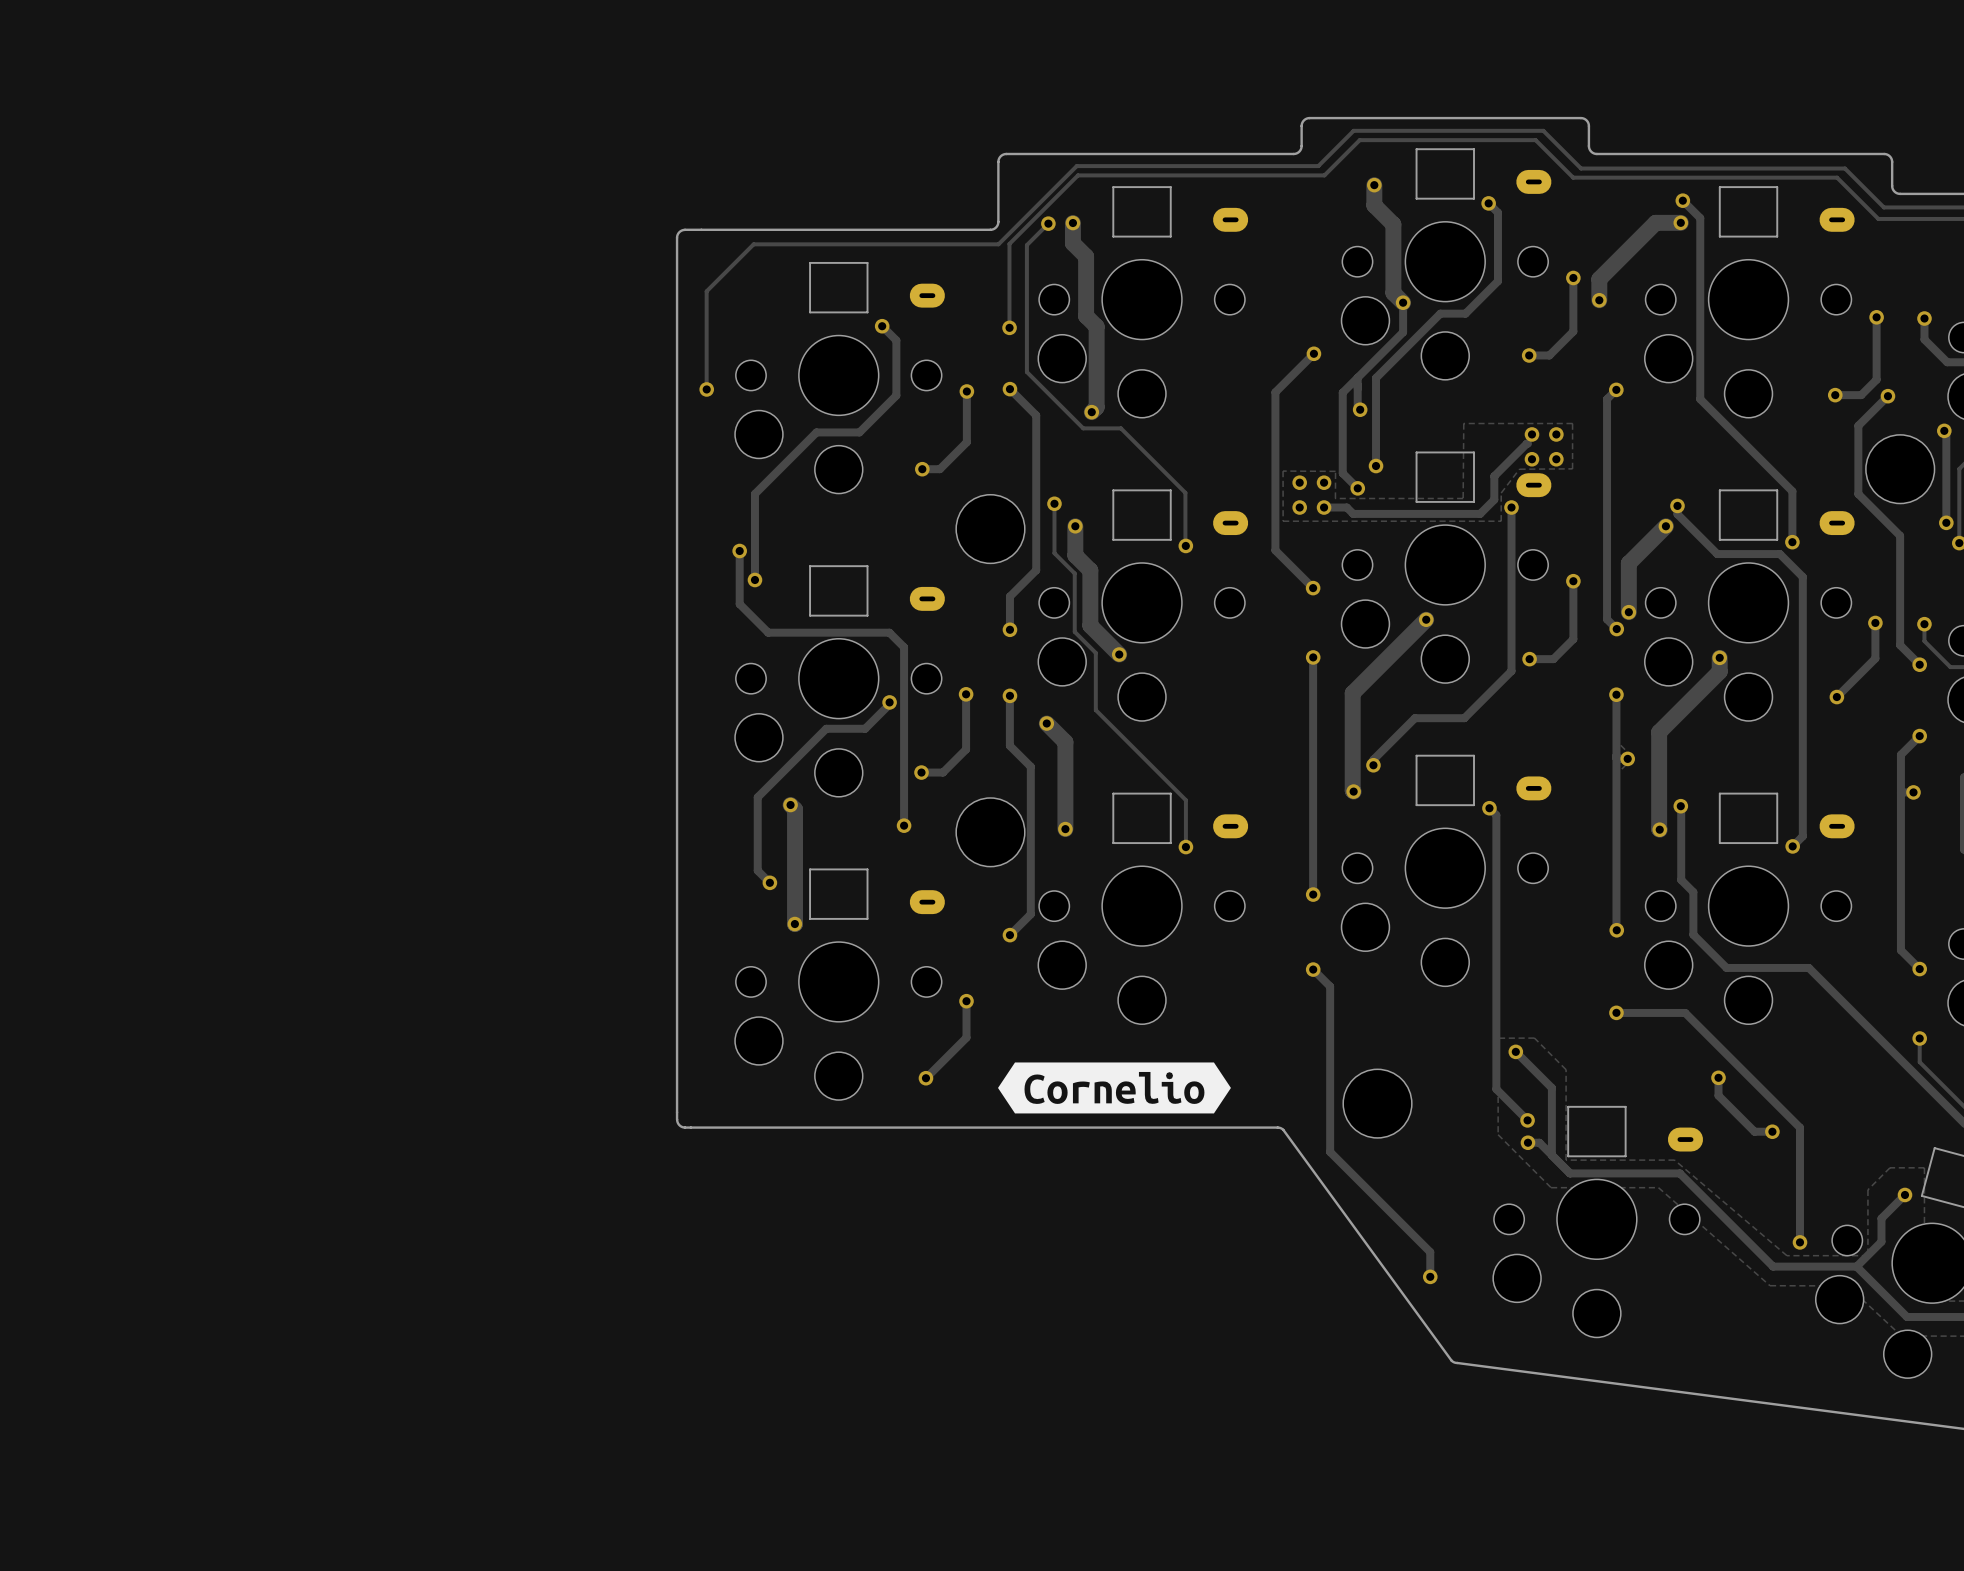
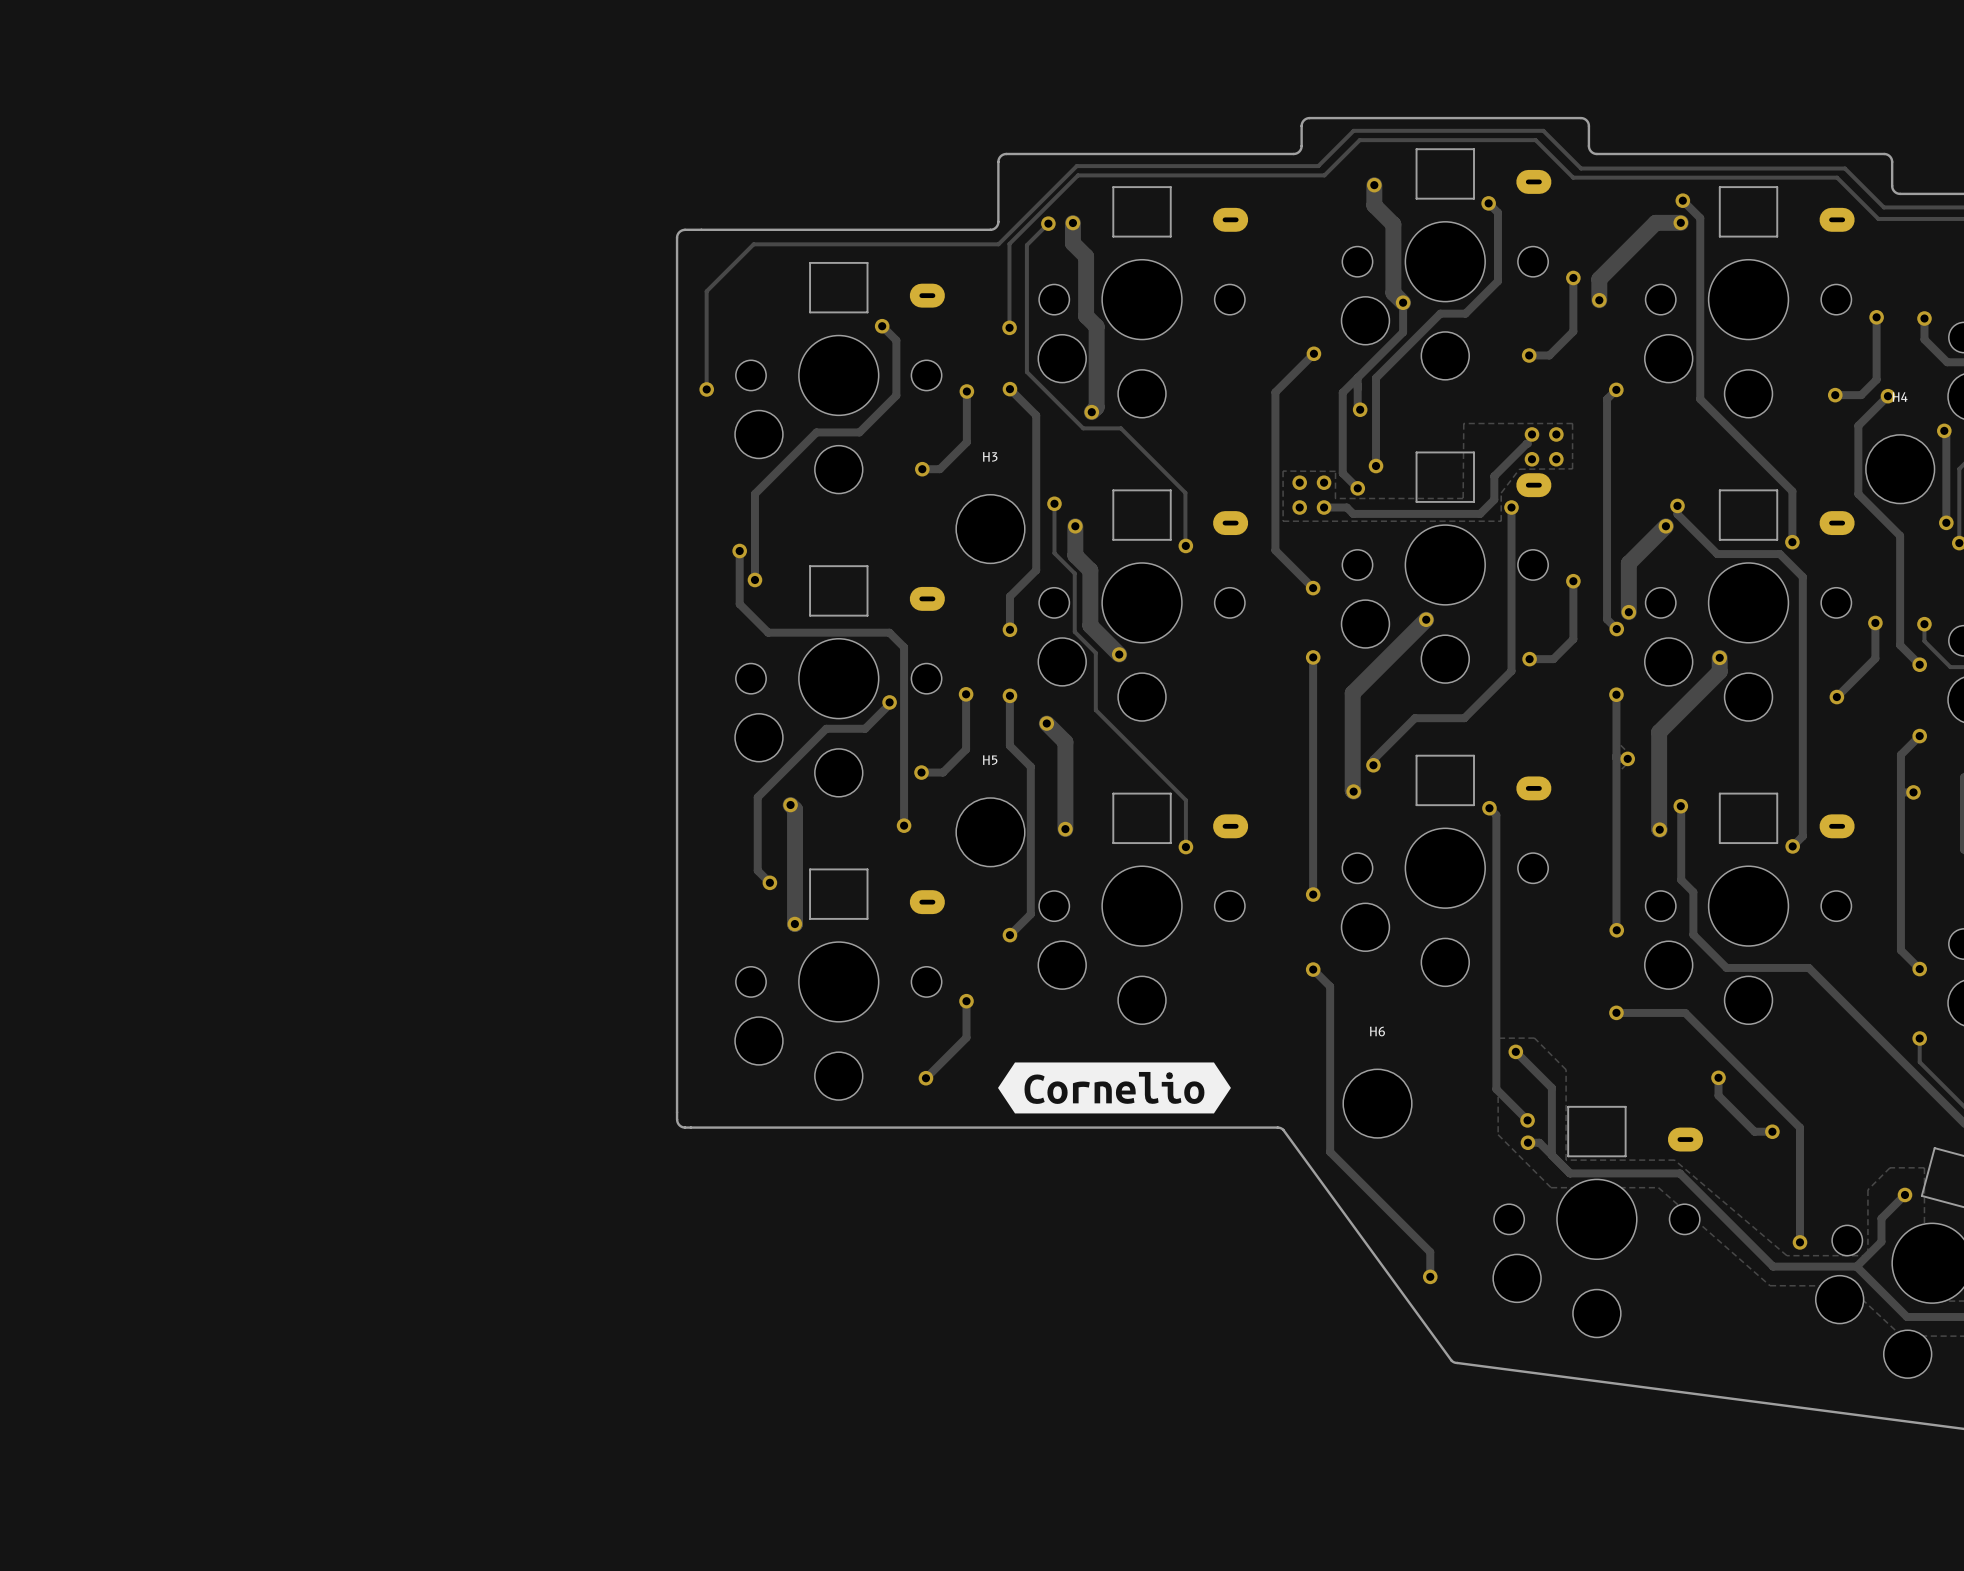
H4 name: none -> H4 (1900, 397)
H3 name: none -> H3 (990, 456)
H5 name: none -> H5 (990, 760)
H6 name: none -> H6 (1377, 1031)

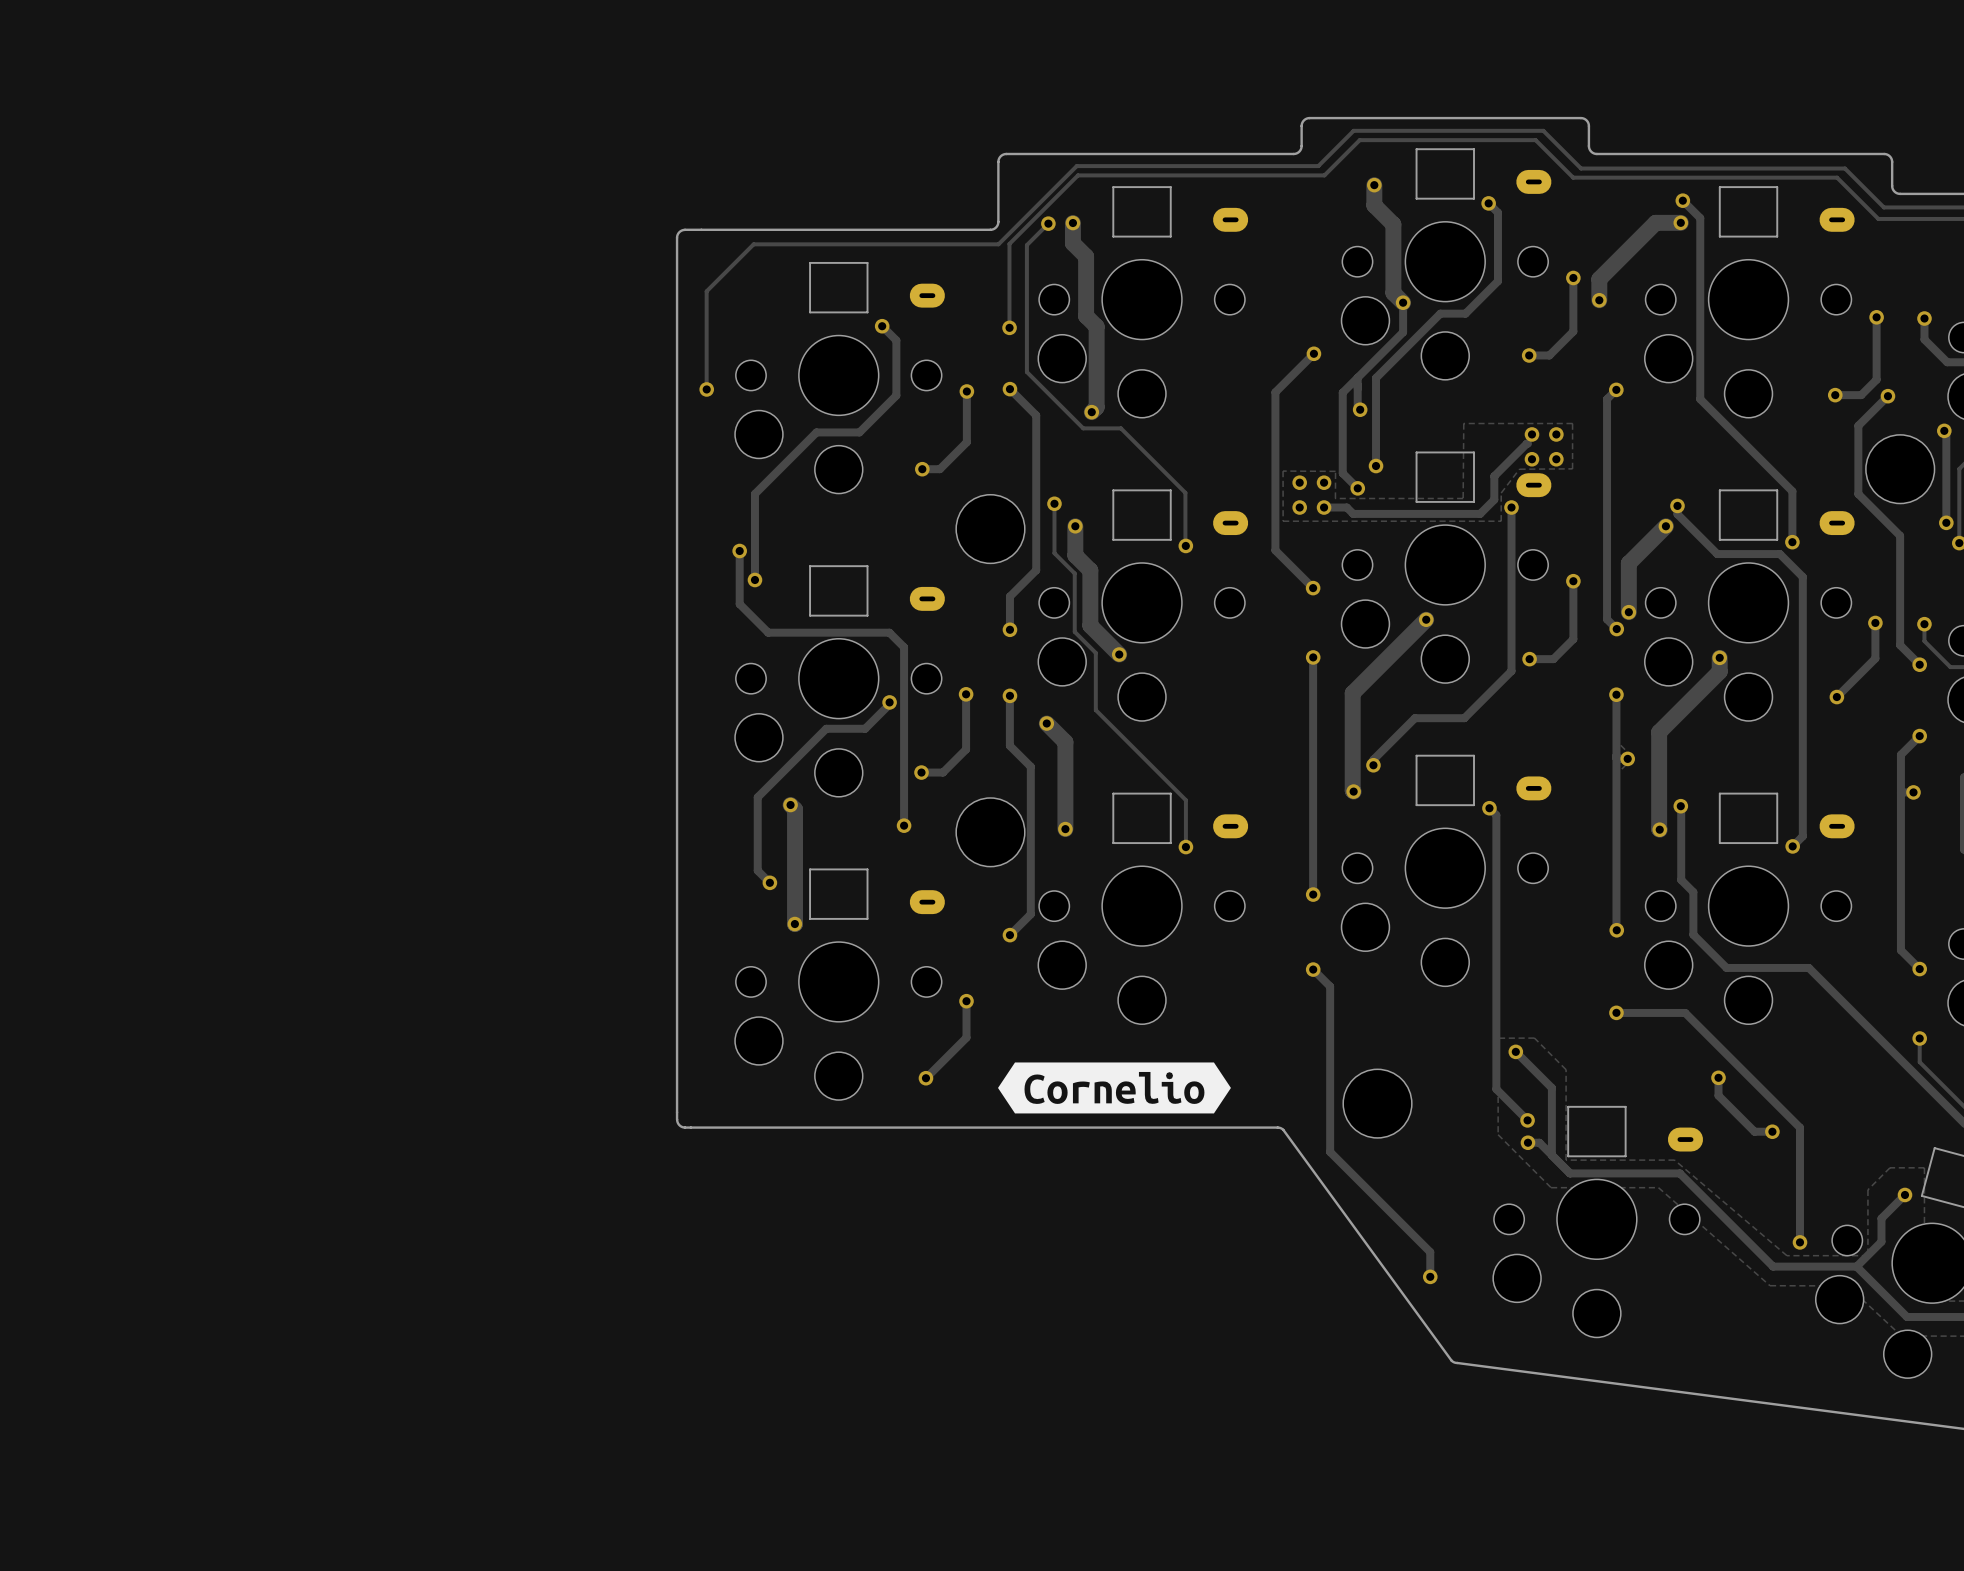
H4 name: H4 (1900, 397) -> none
H3 name: H3 (990, 456) -> none
H5 name: H5 (990, 760) -> none
H6 name: H6 (1377, 1031) -> none

